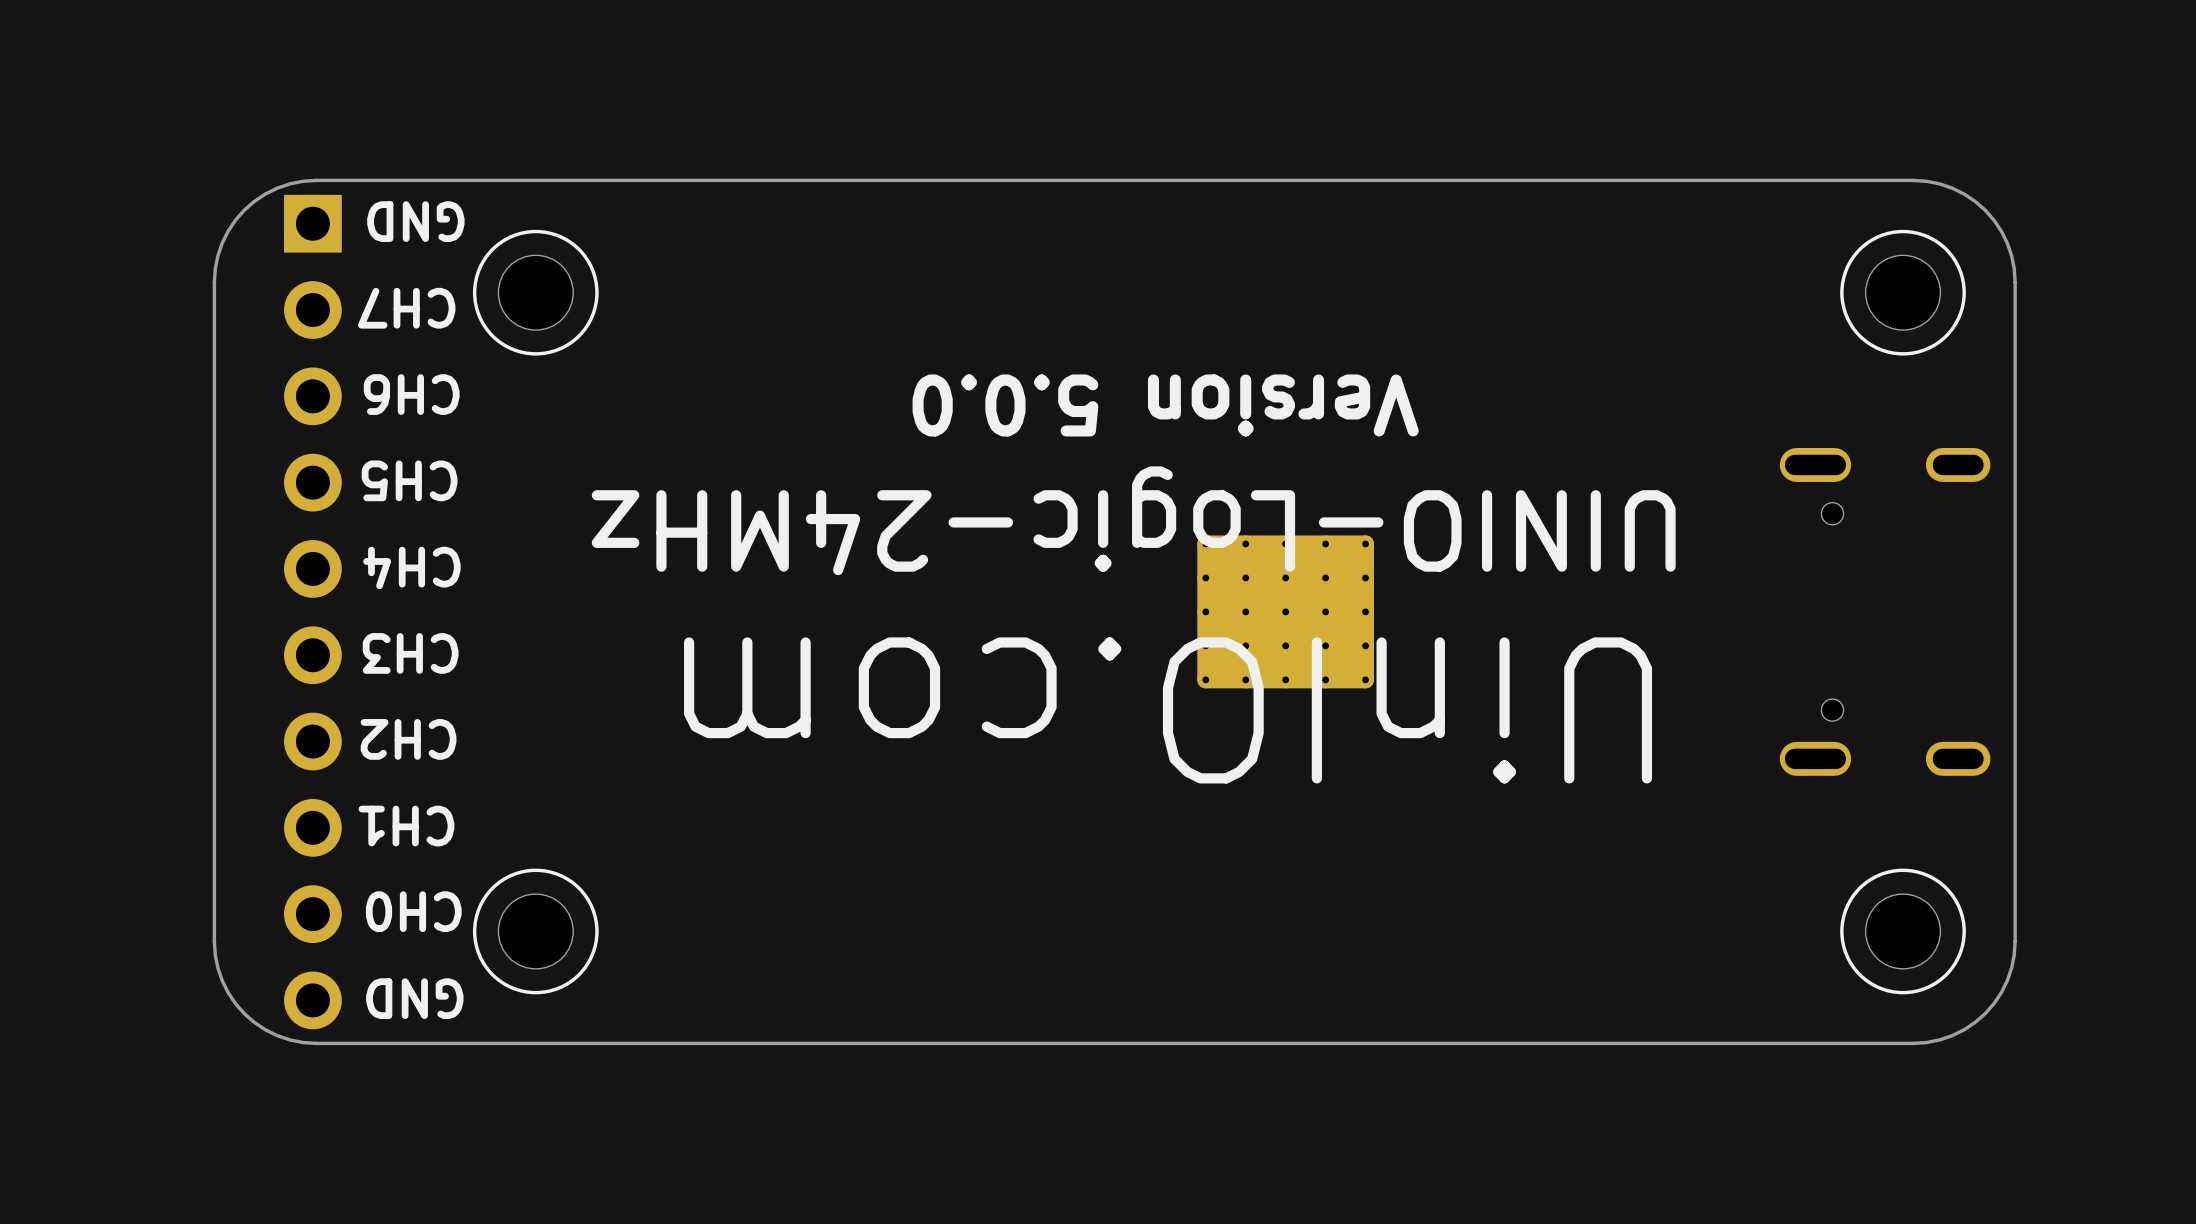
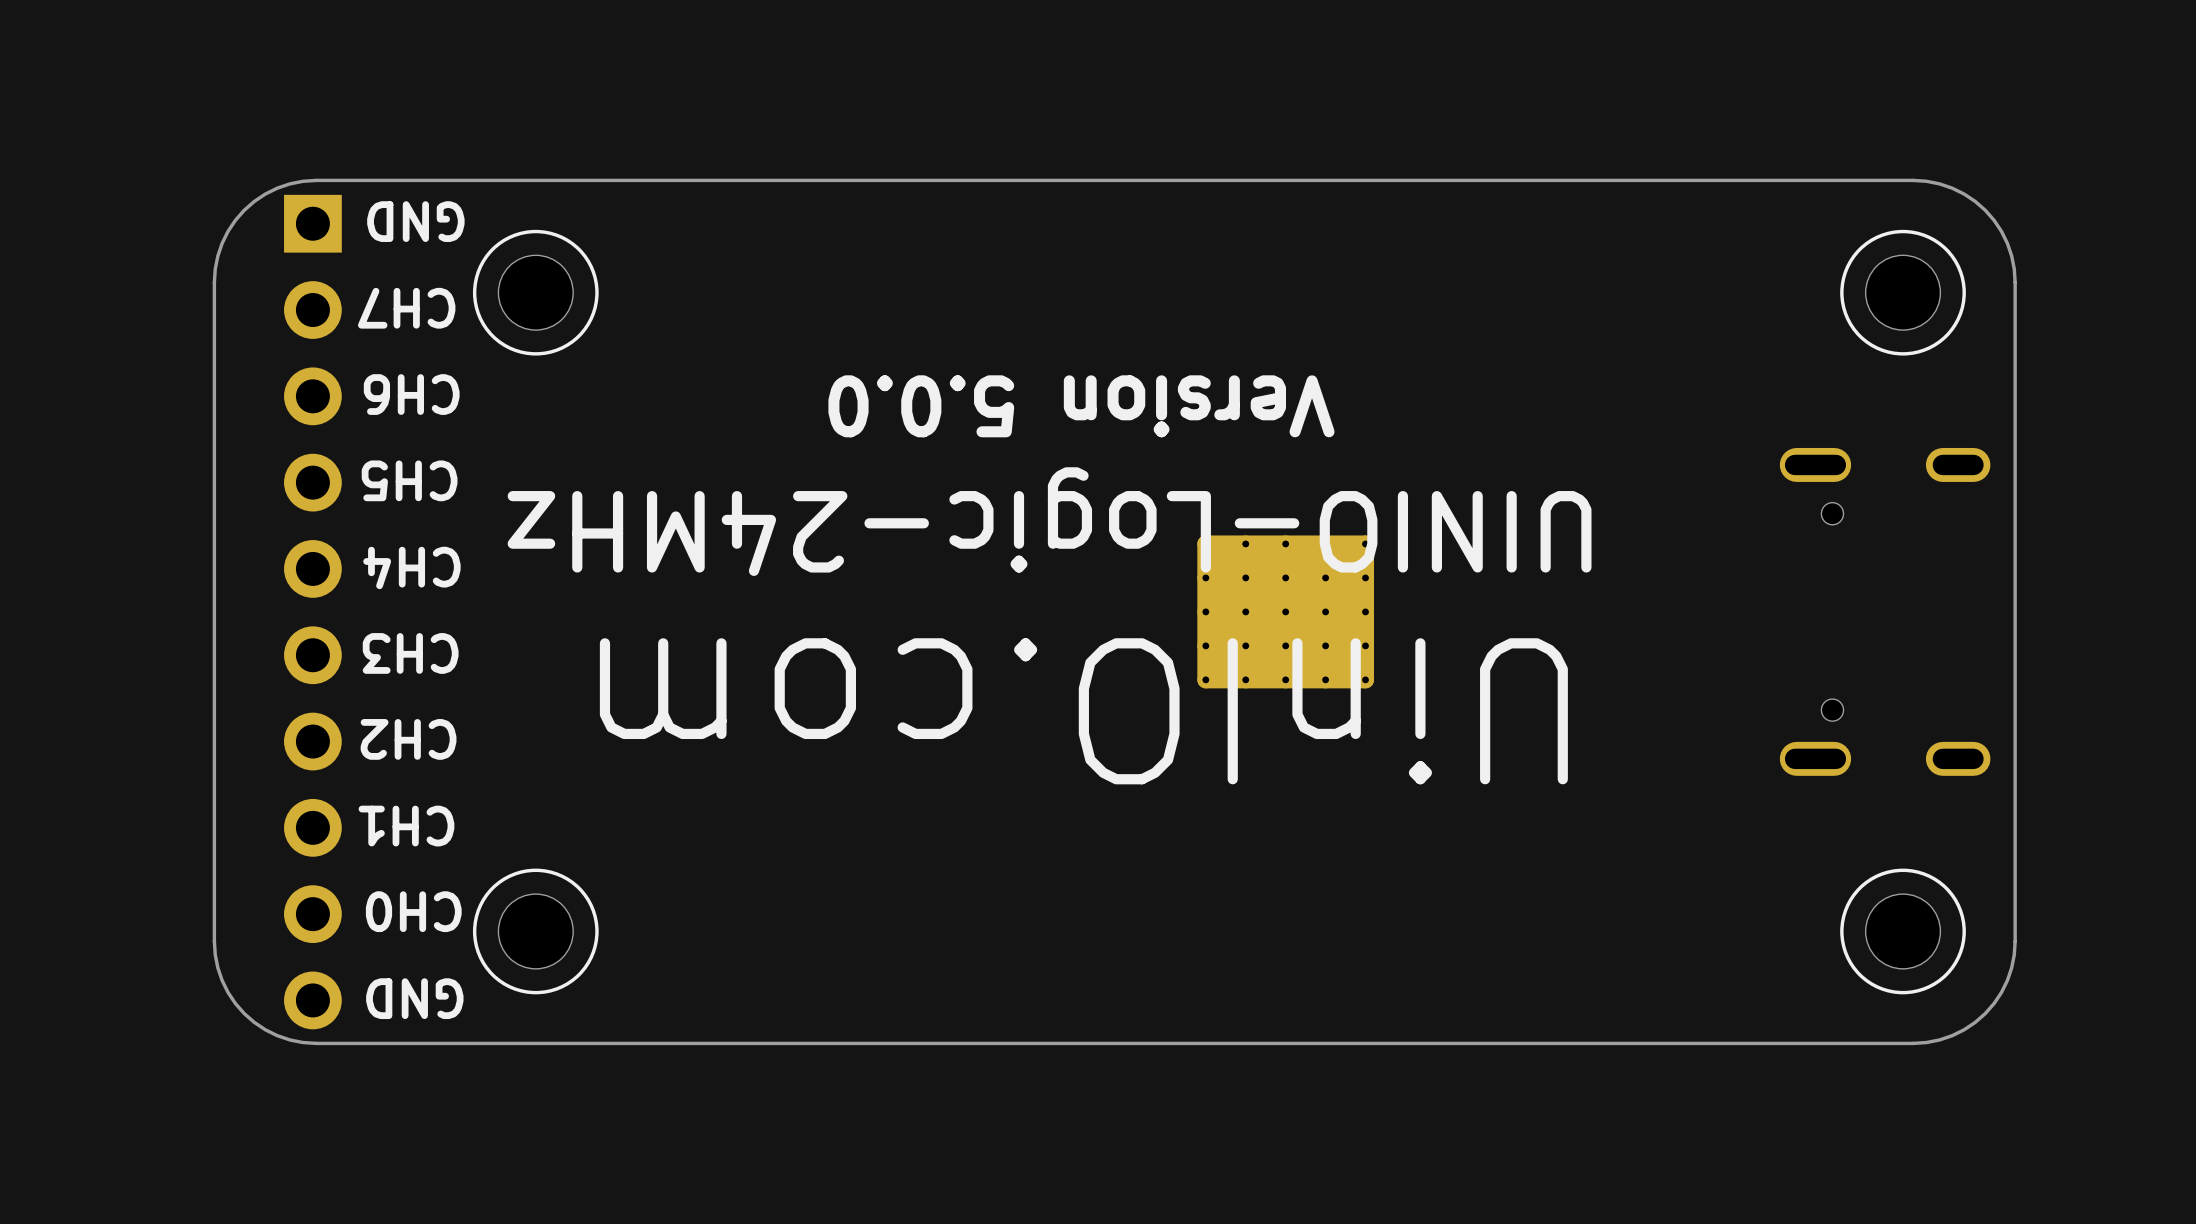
text position: Version 5.0.0 (1165, 405) -> Version 5.0.0 (1081, 406)
text position: UINIO-Logic-24MHz (1133, 520) -> UINIO-Logic-24MHz (1049, 521)
text position: UinIO.com (1168, 710) -> UinIO.com (1083, 711)

